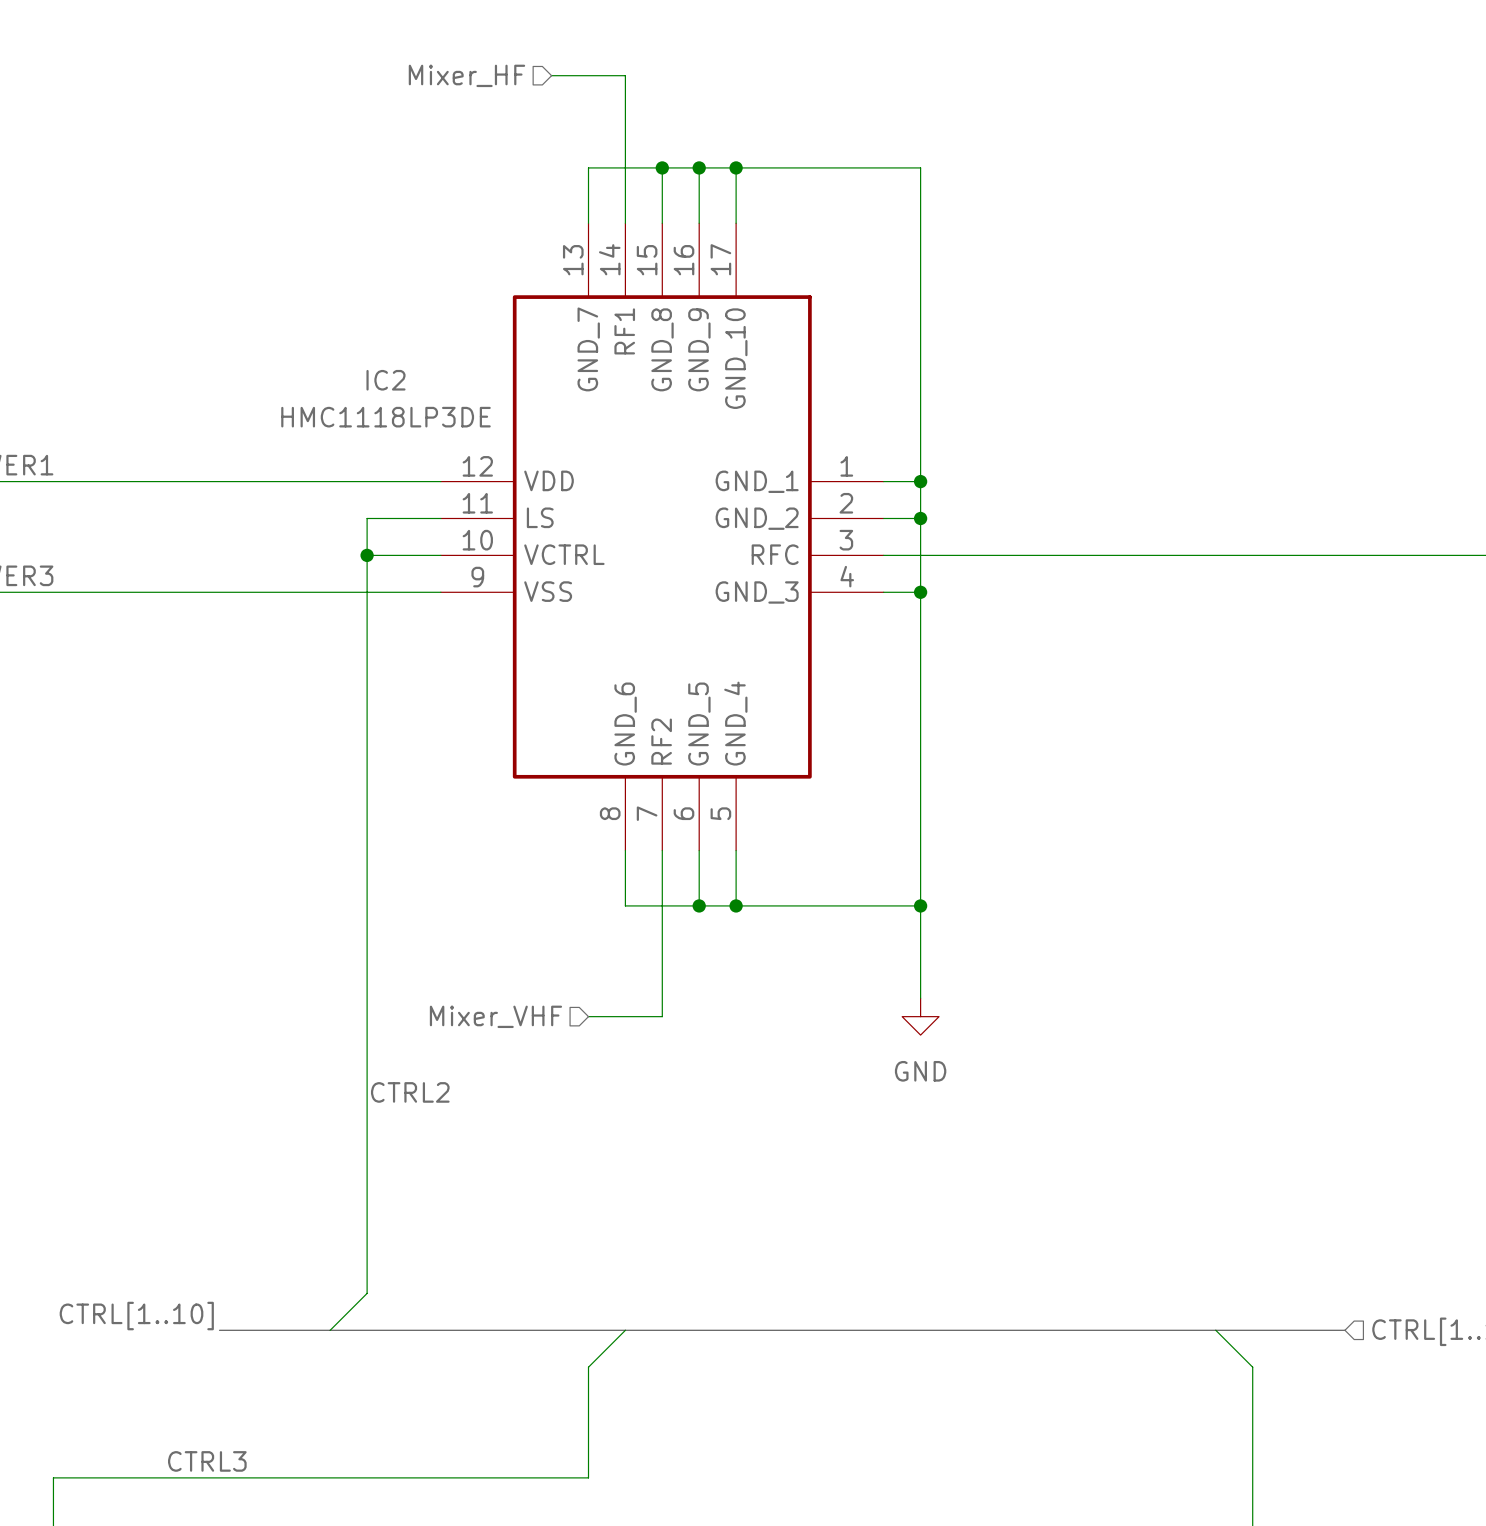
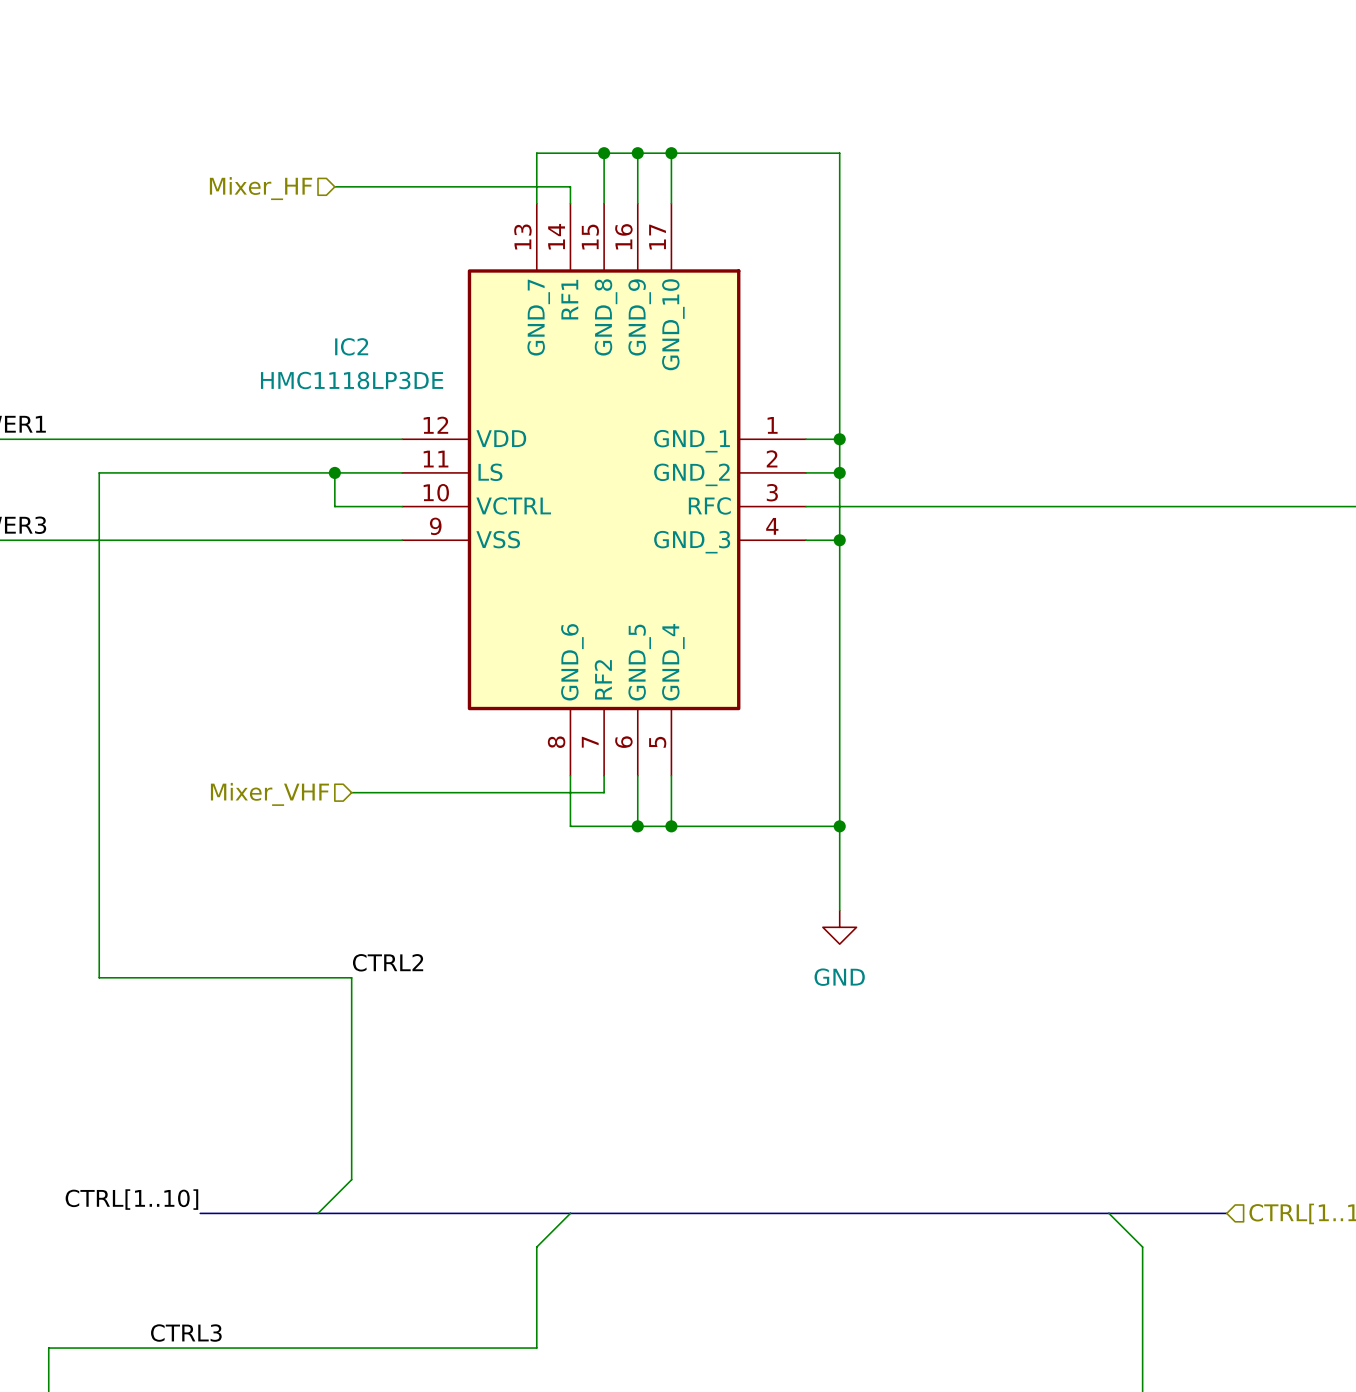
hierarchical label position: Mixer_HF (466, 75) -> Mixer_HF (261, 188)
wire: (551, 75) (625, 75) (625, 204) -> (334, 186) (570, 186)
wire: none -> (334, 472) (99, 472) (99, 977) (351, 977) (351, 1179) (318, 1213)
wire: (367, 555) (367, 1293) (330, 1330) -> none
junction position: (367, 555) -> (334, 472)
wire: (662, 869) (662, 1016) (588, 1016) -> (604, 792) (351, 792)
hierarchical label position: Mixer_VHF (495, 1016) -> Mixer_VHF (269, 794)
label position: CTRL2 (410, 1092) -> CTRL2 (388, 962)

